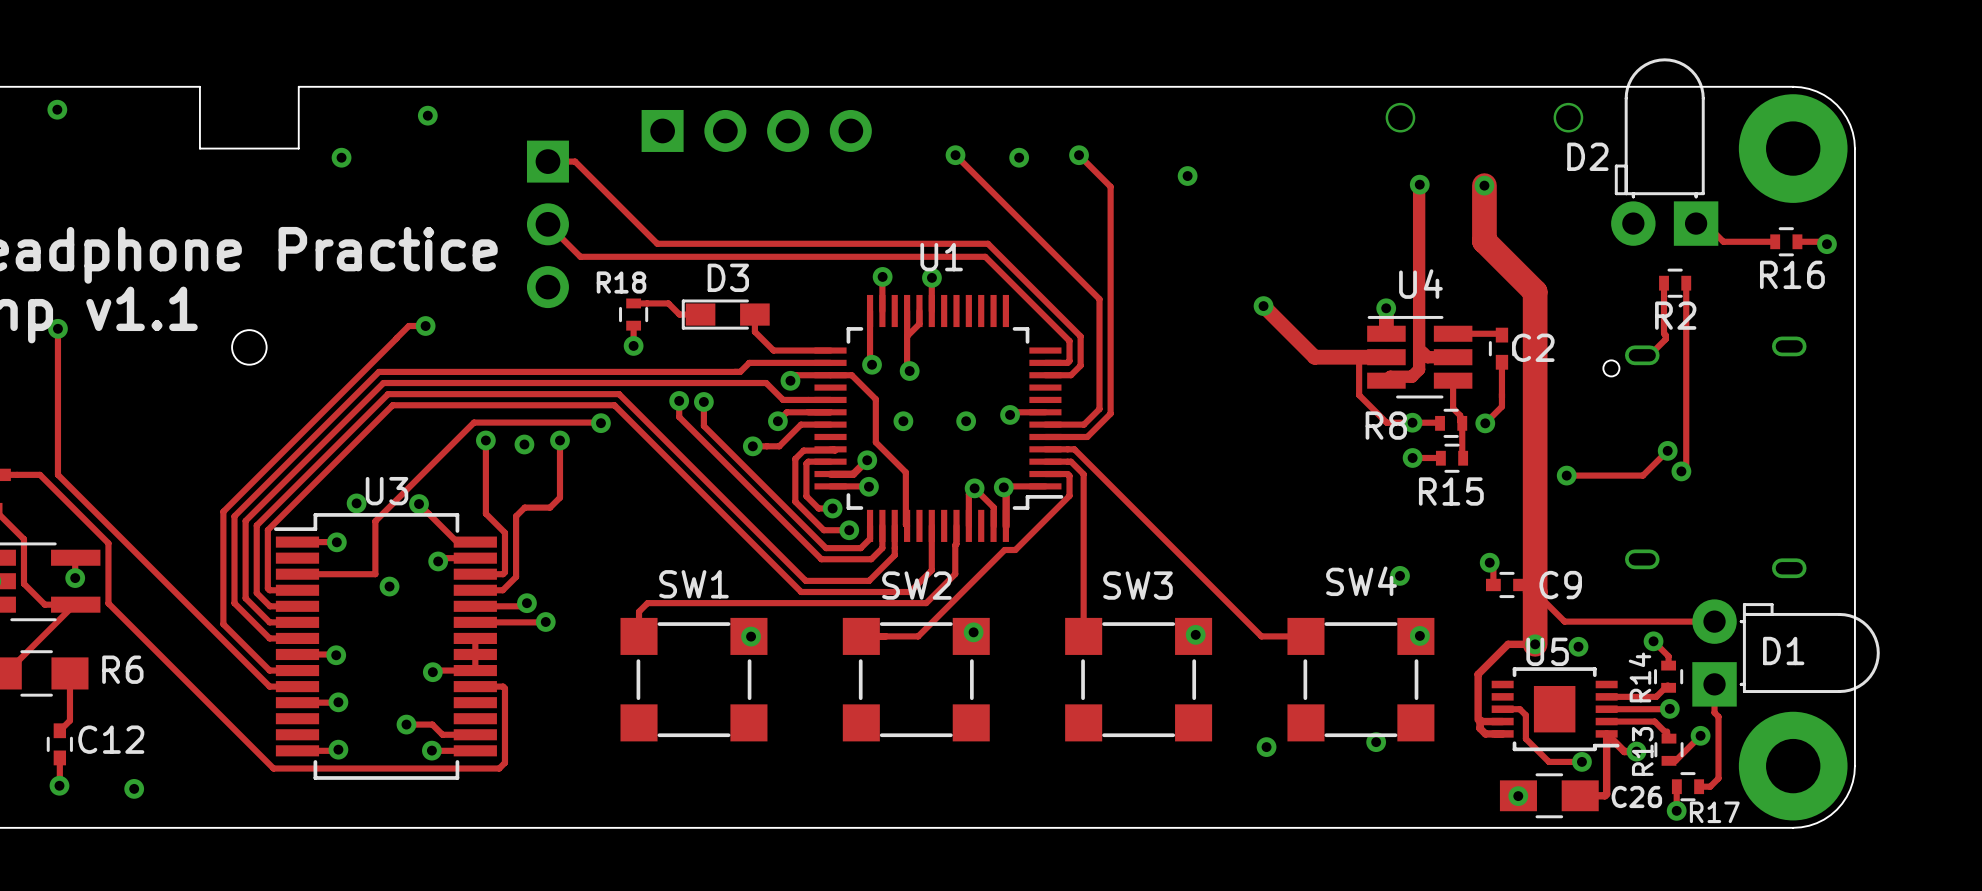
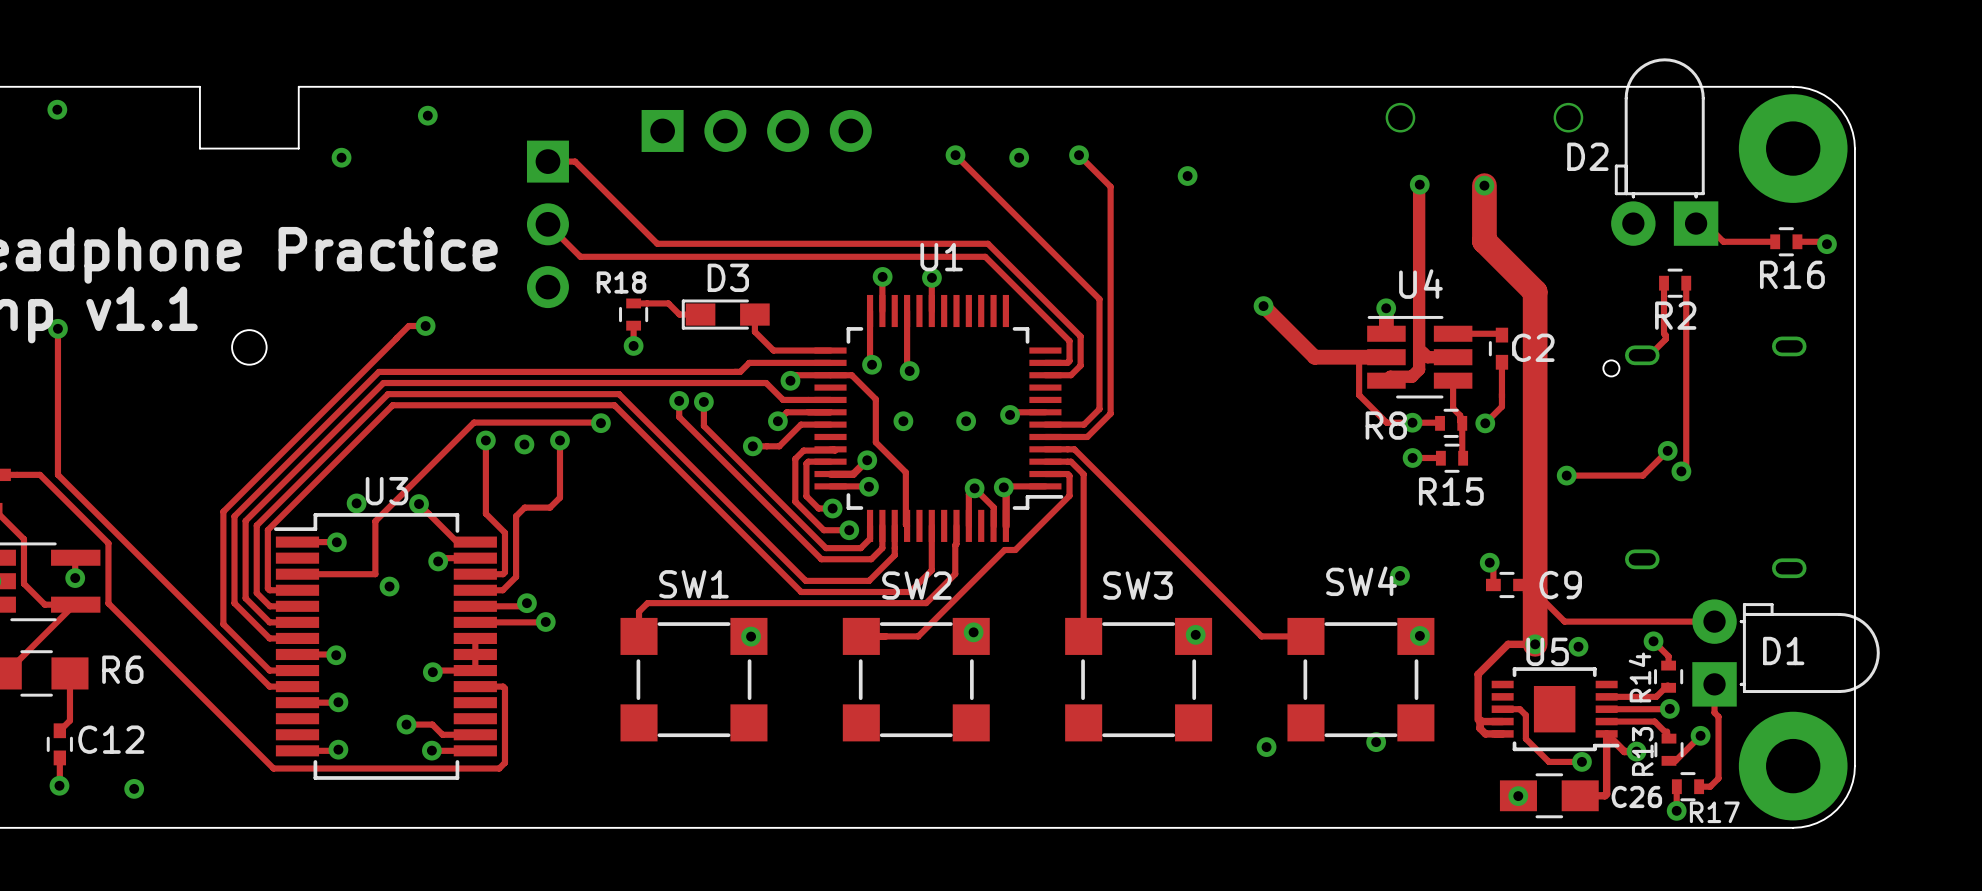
track: (919, 311) (919, 323) (907, 336) -> none

